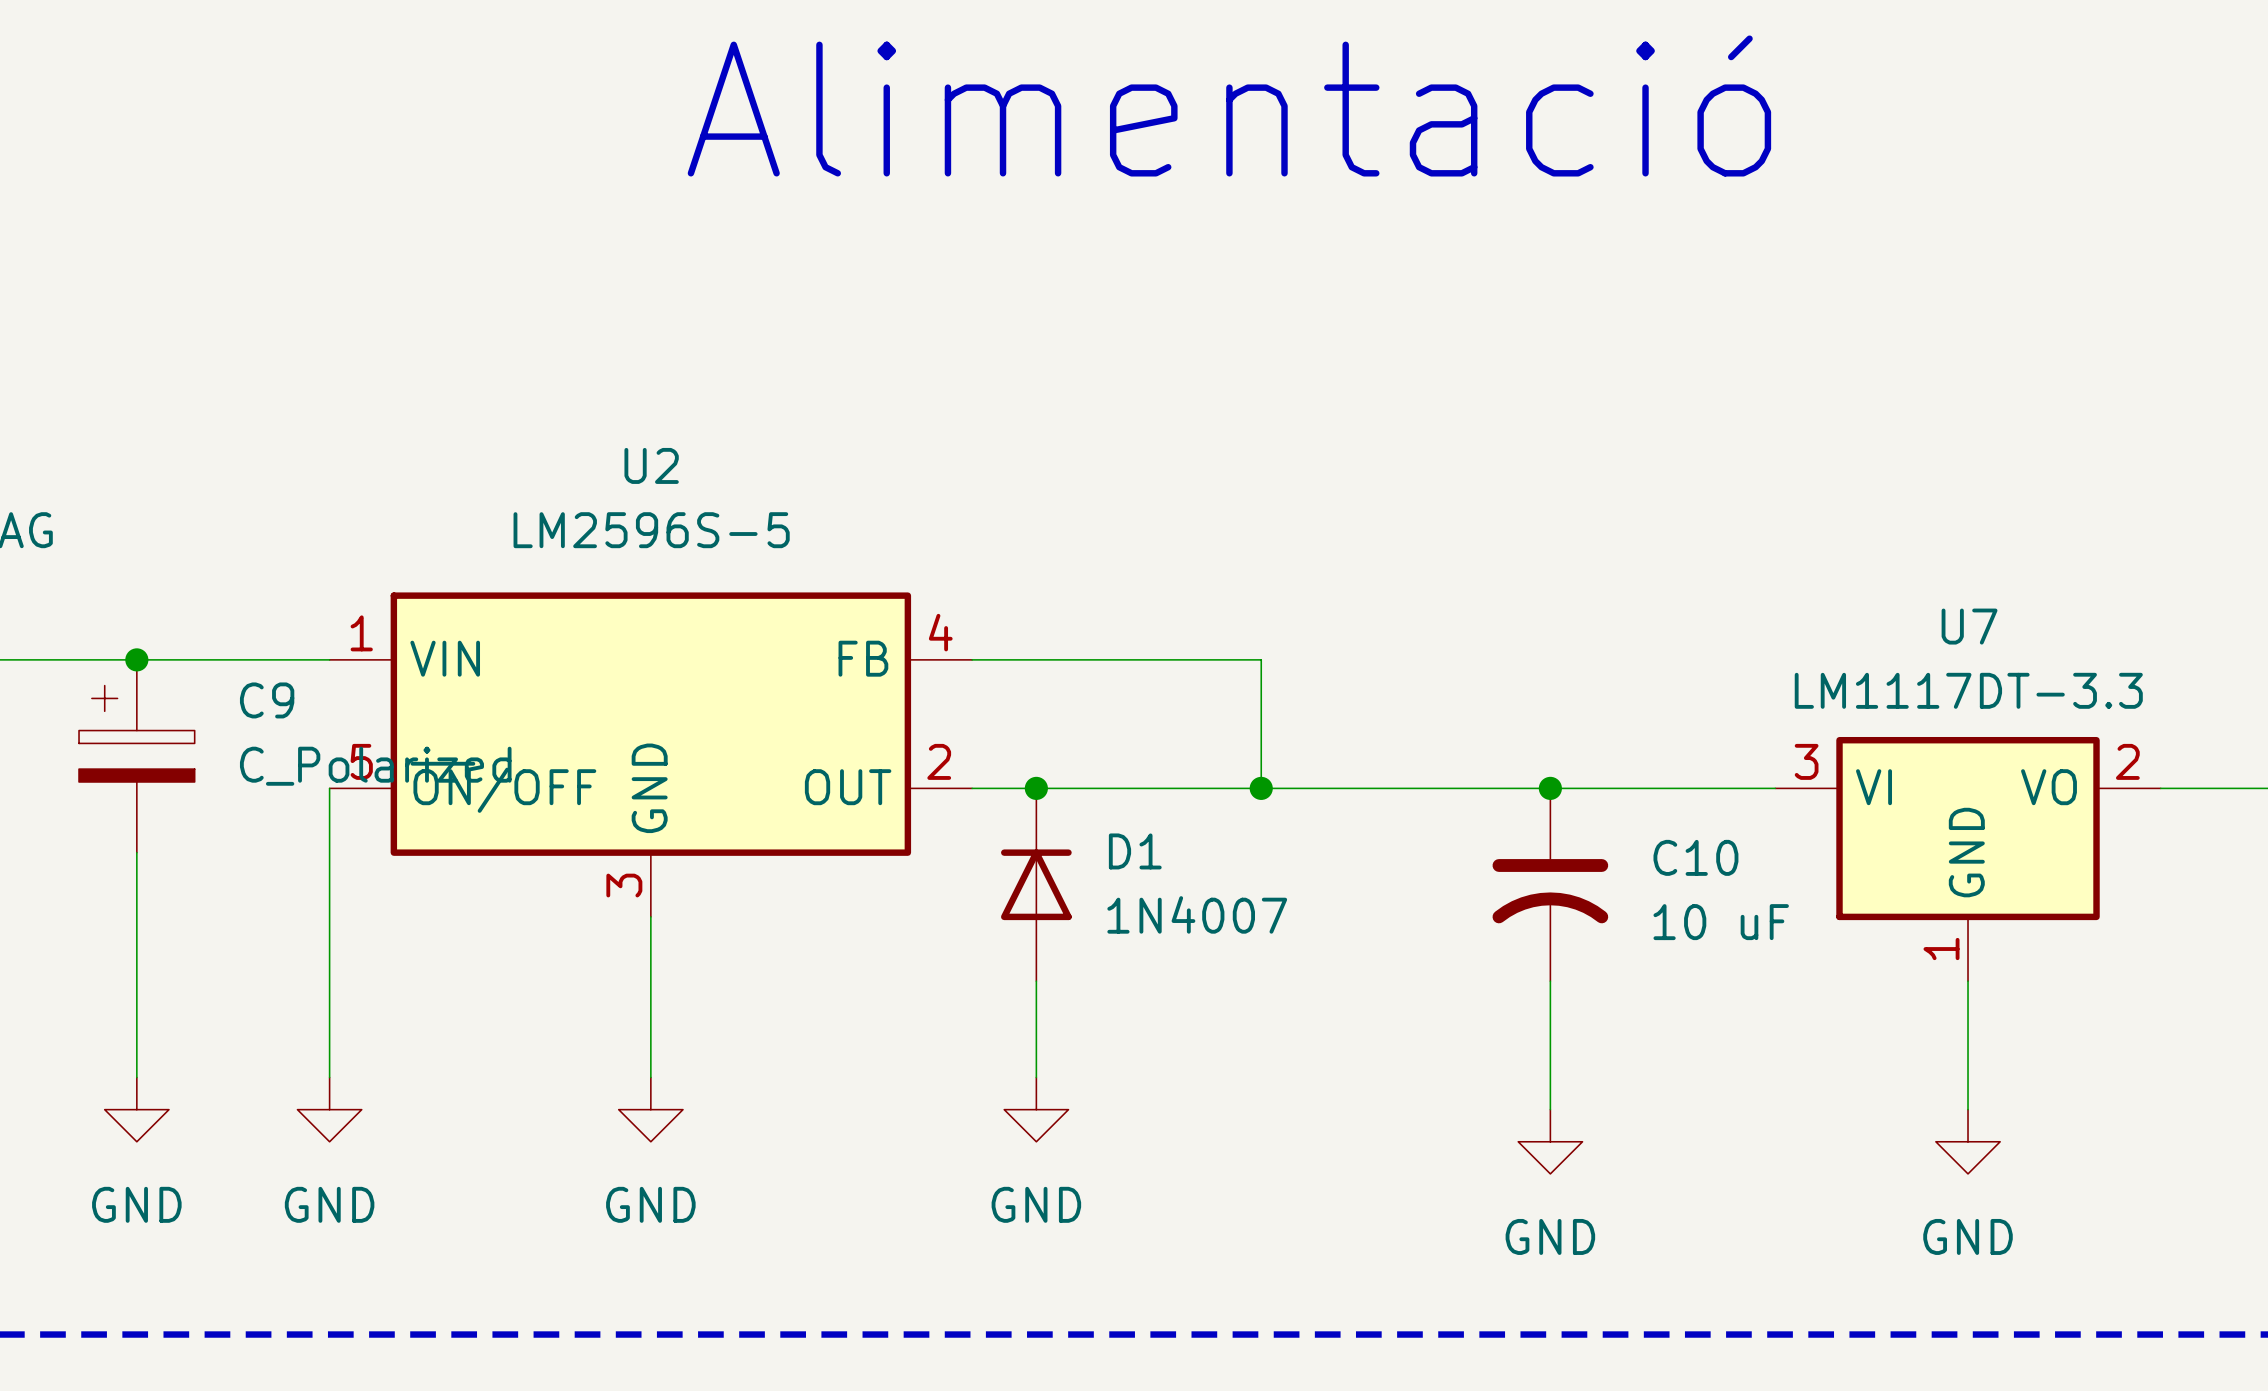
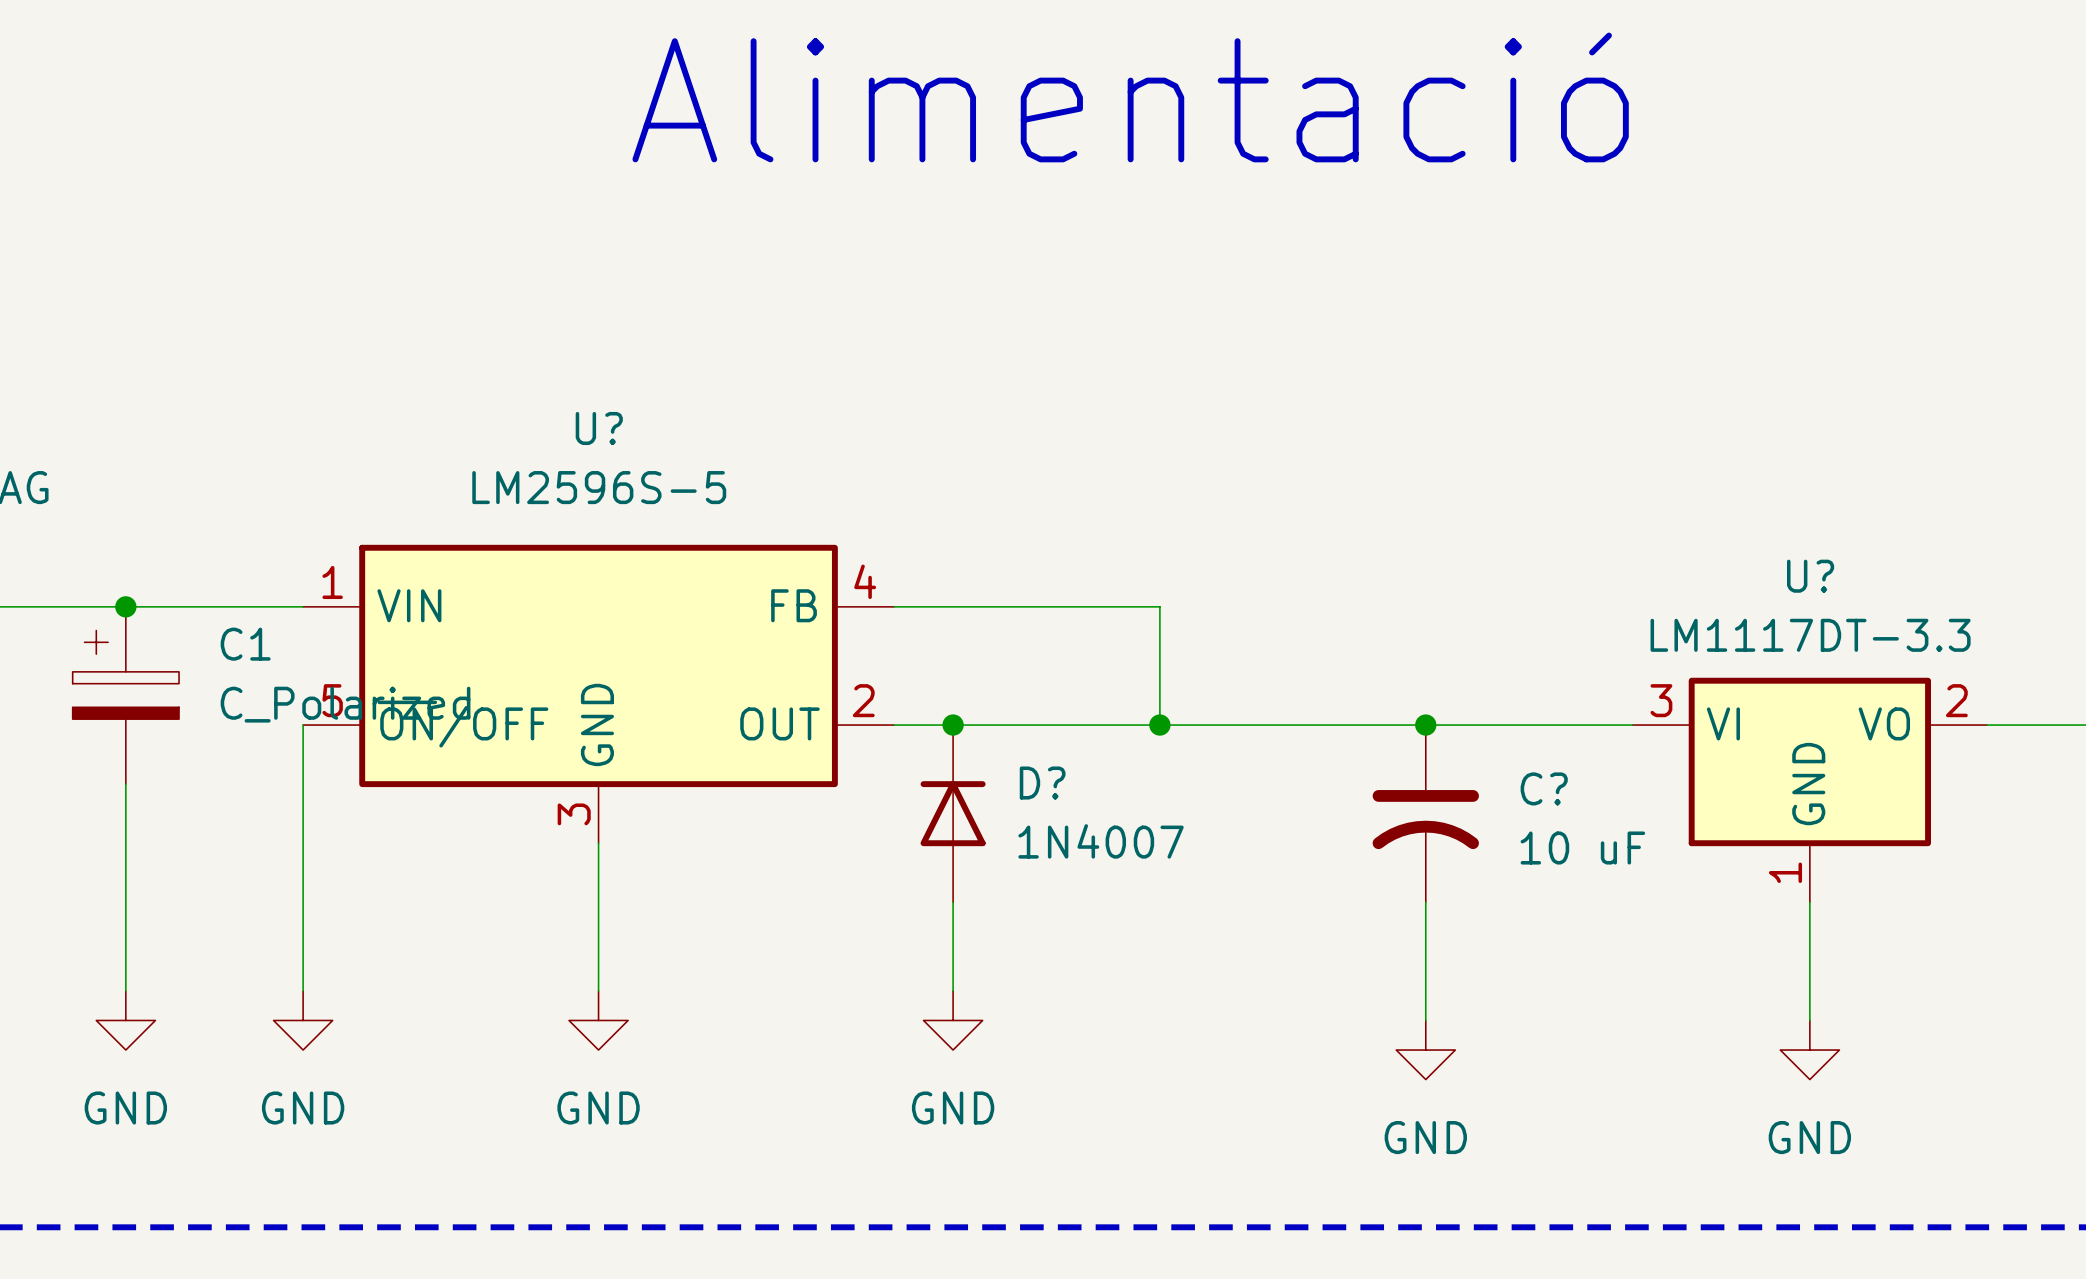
U2 name: U2 (651, 465) -> U? (599, 428)
U7 name: U7 (1969, 626) -> U? (1810, 576)
C9 name: C9 (267, 700) -> C1 (245, 644)
D1 name: D1 (1135, 851) -> D? (1042, 783)
C10 name: C10 (1695, 857) -> C? (1544, 788)

